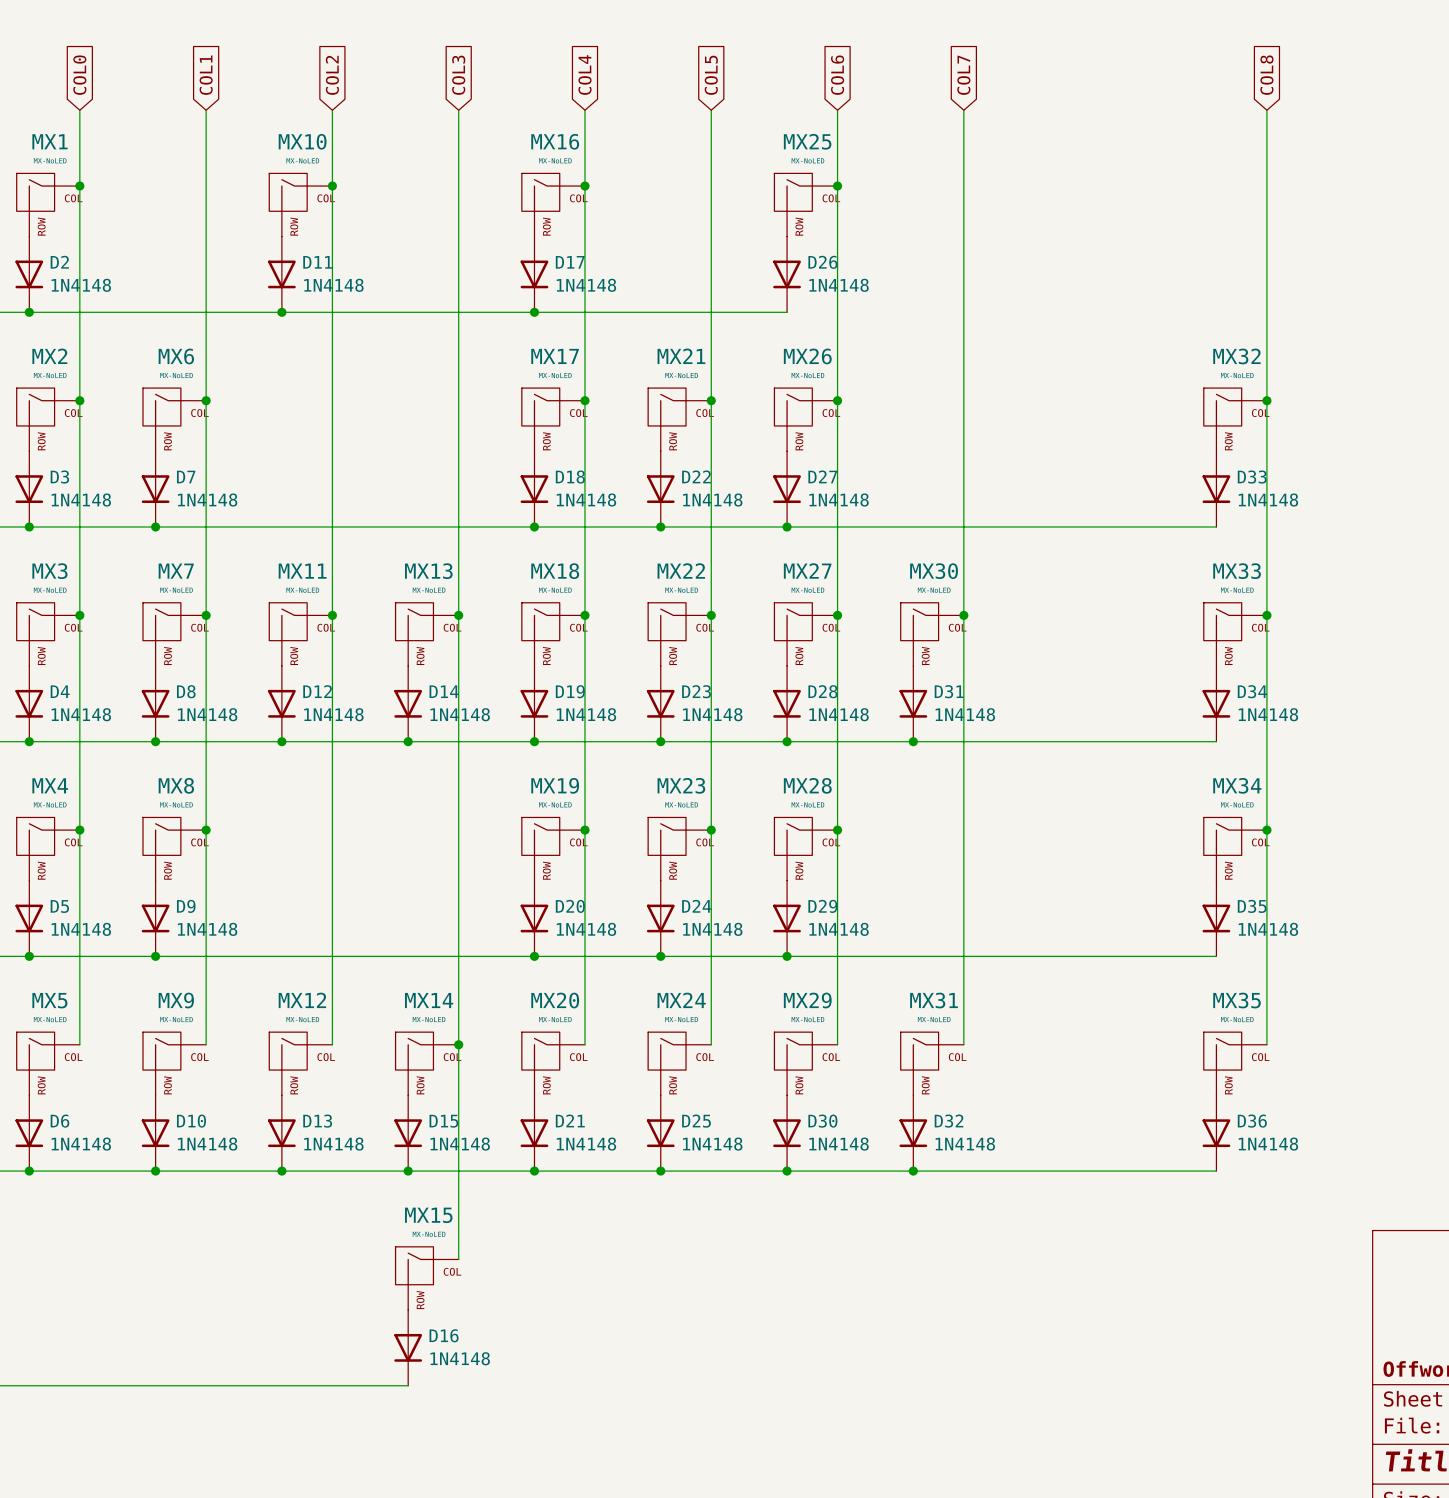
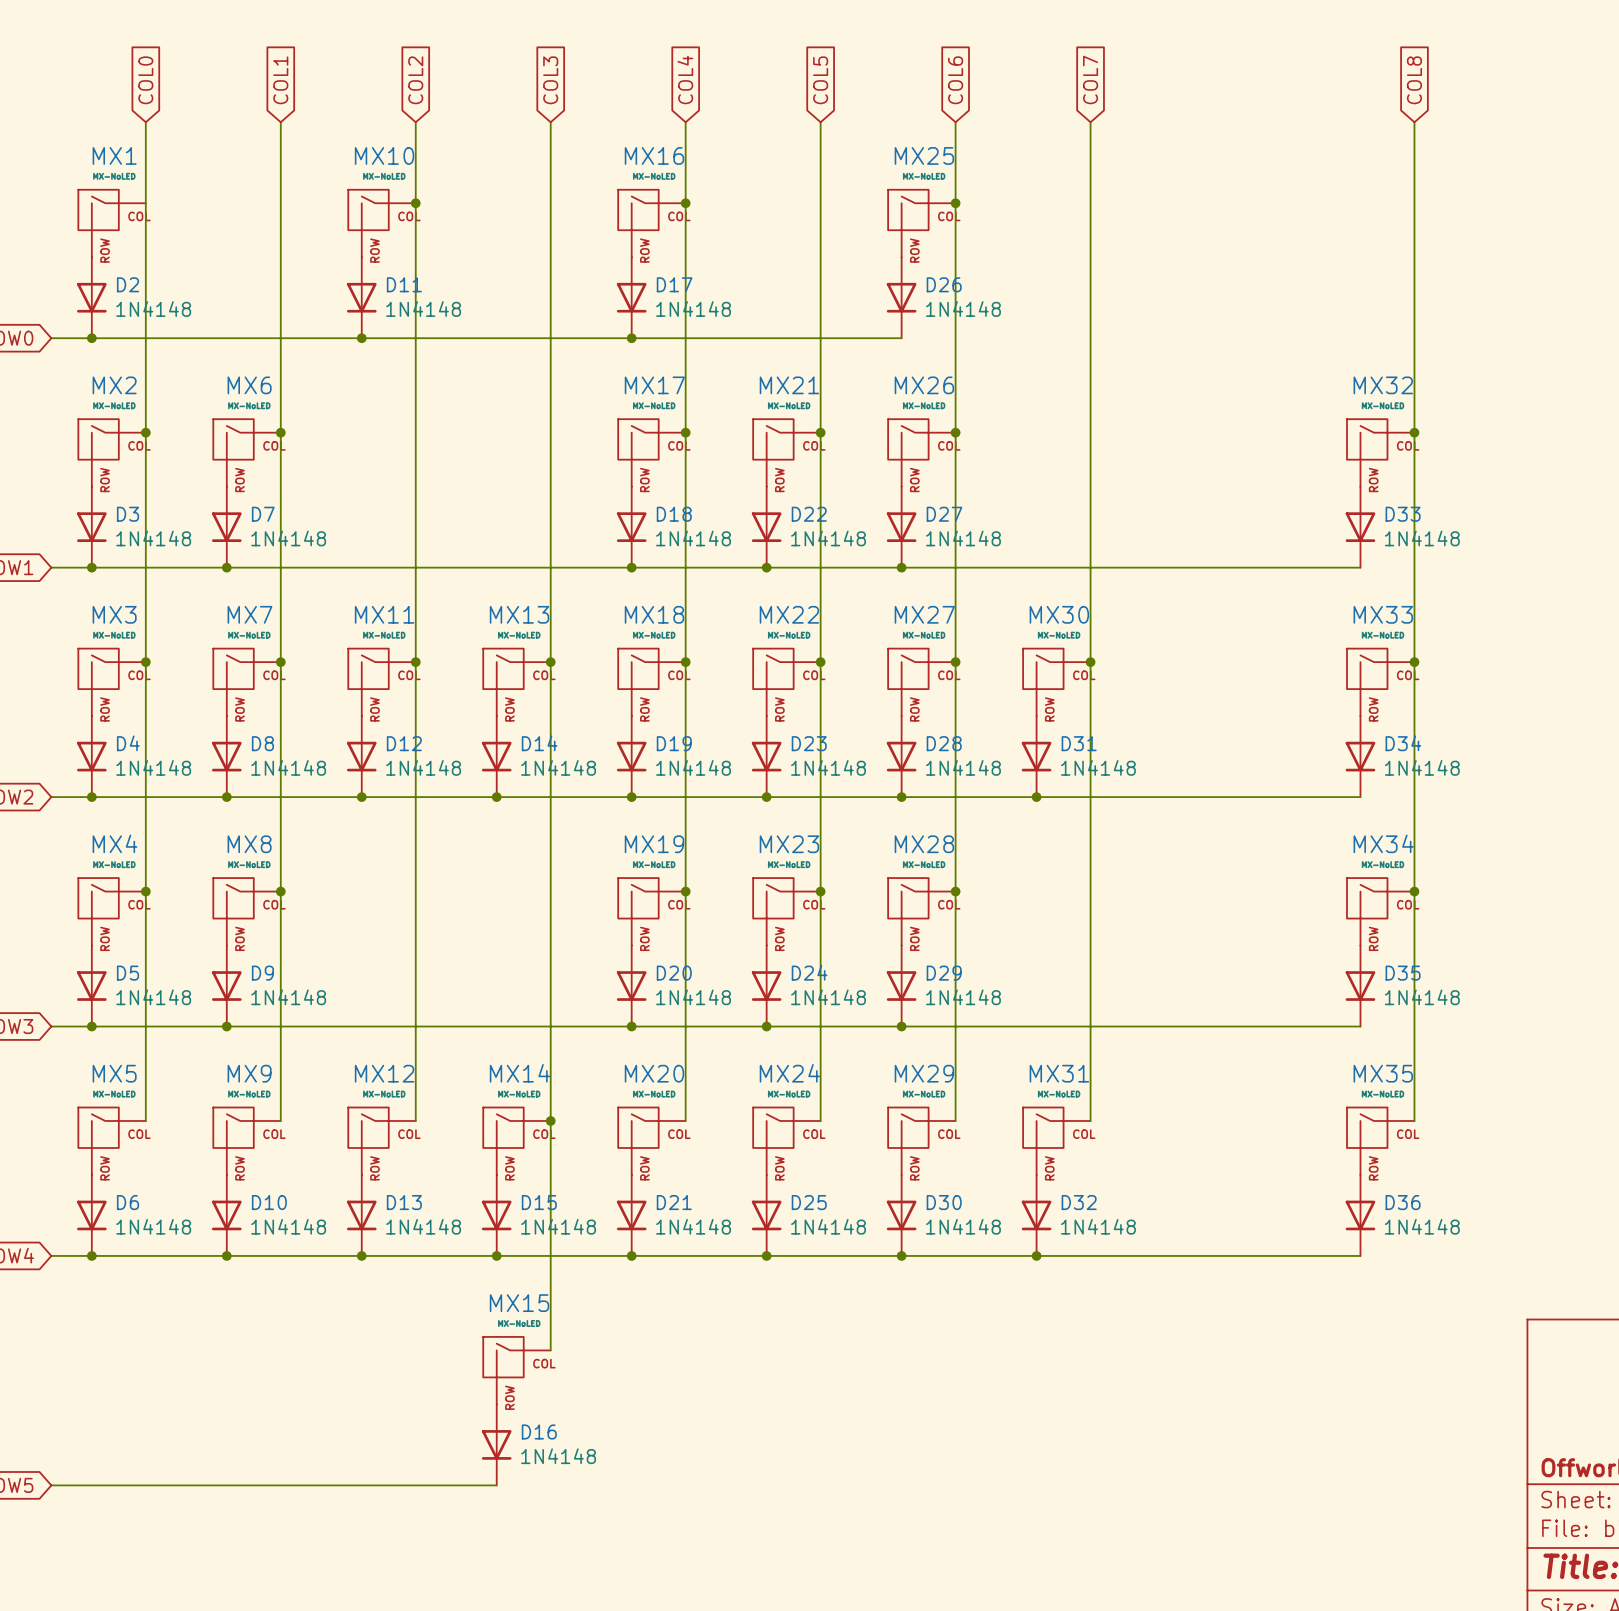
junction: (79, 186) -> none

